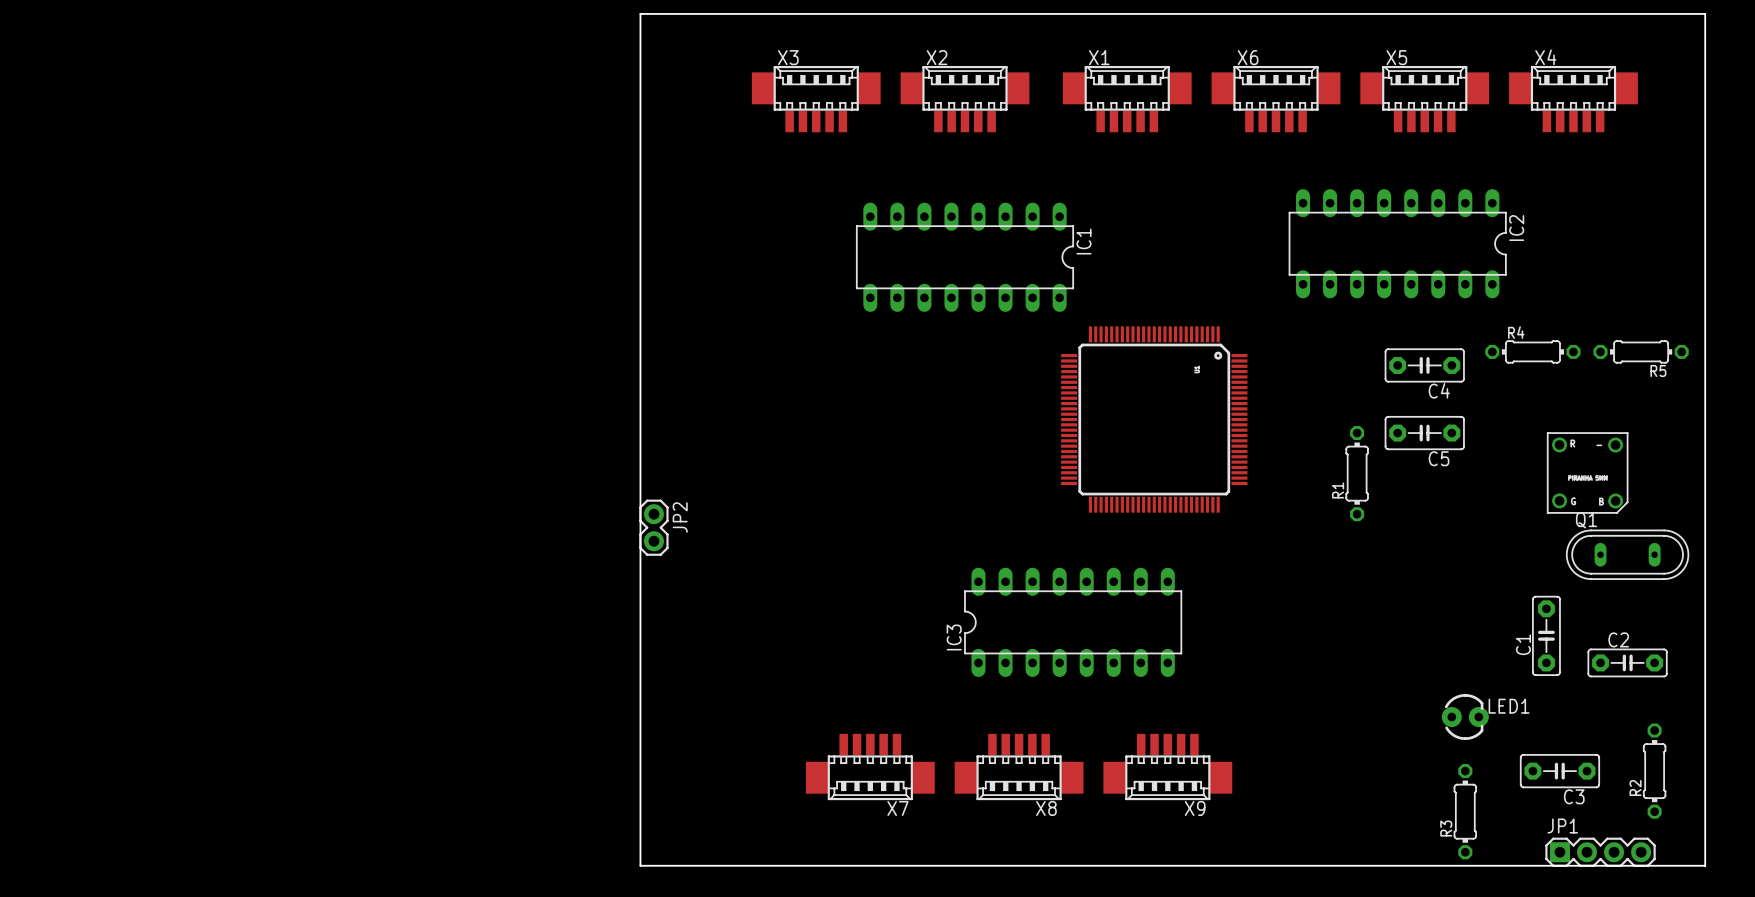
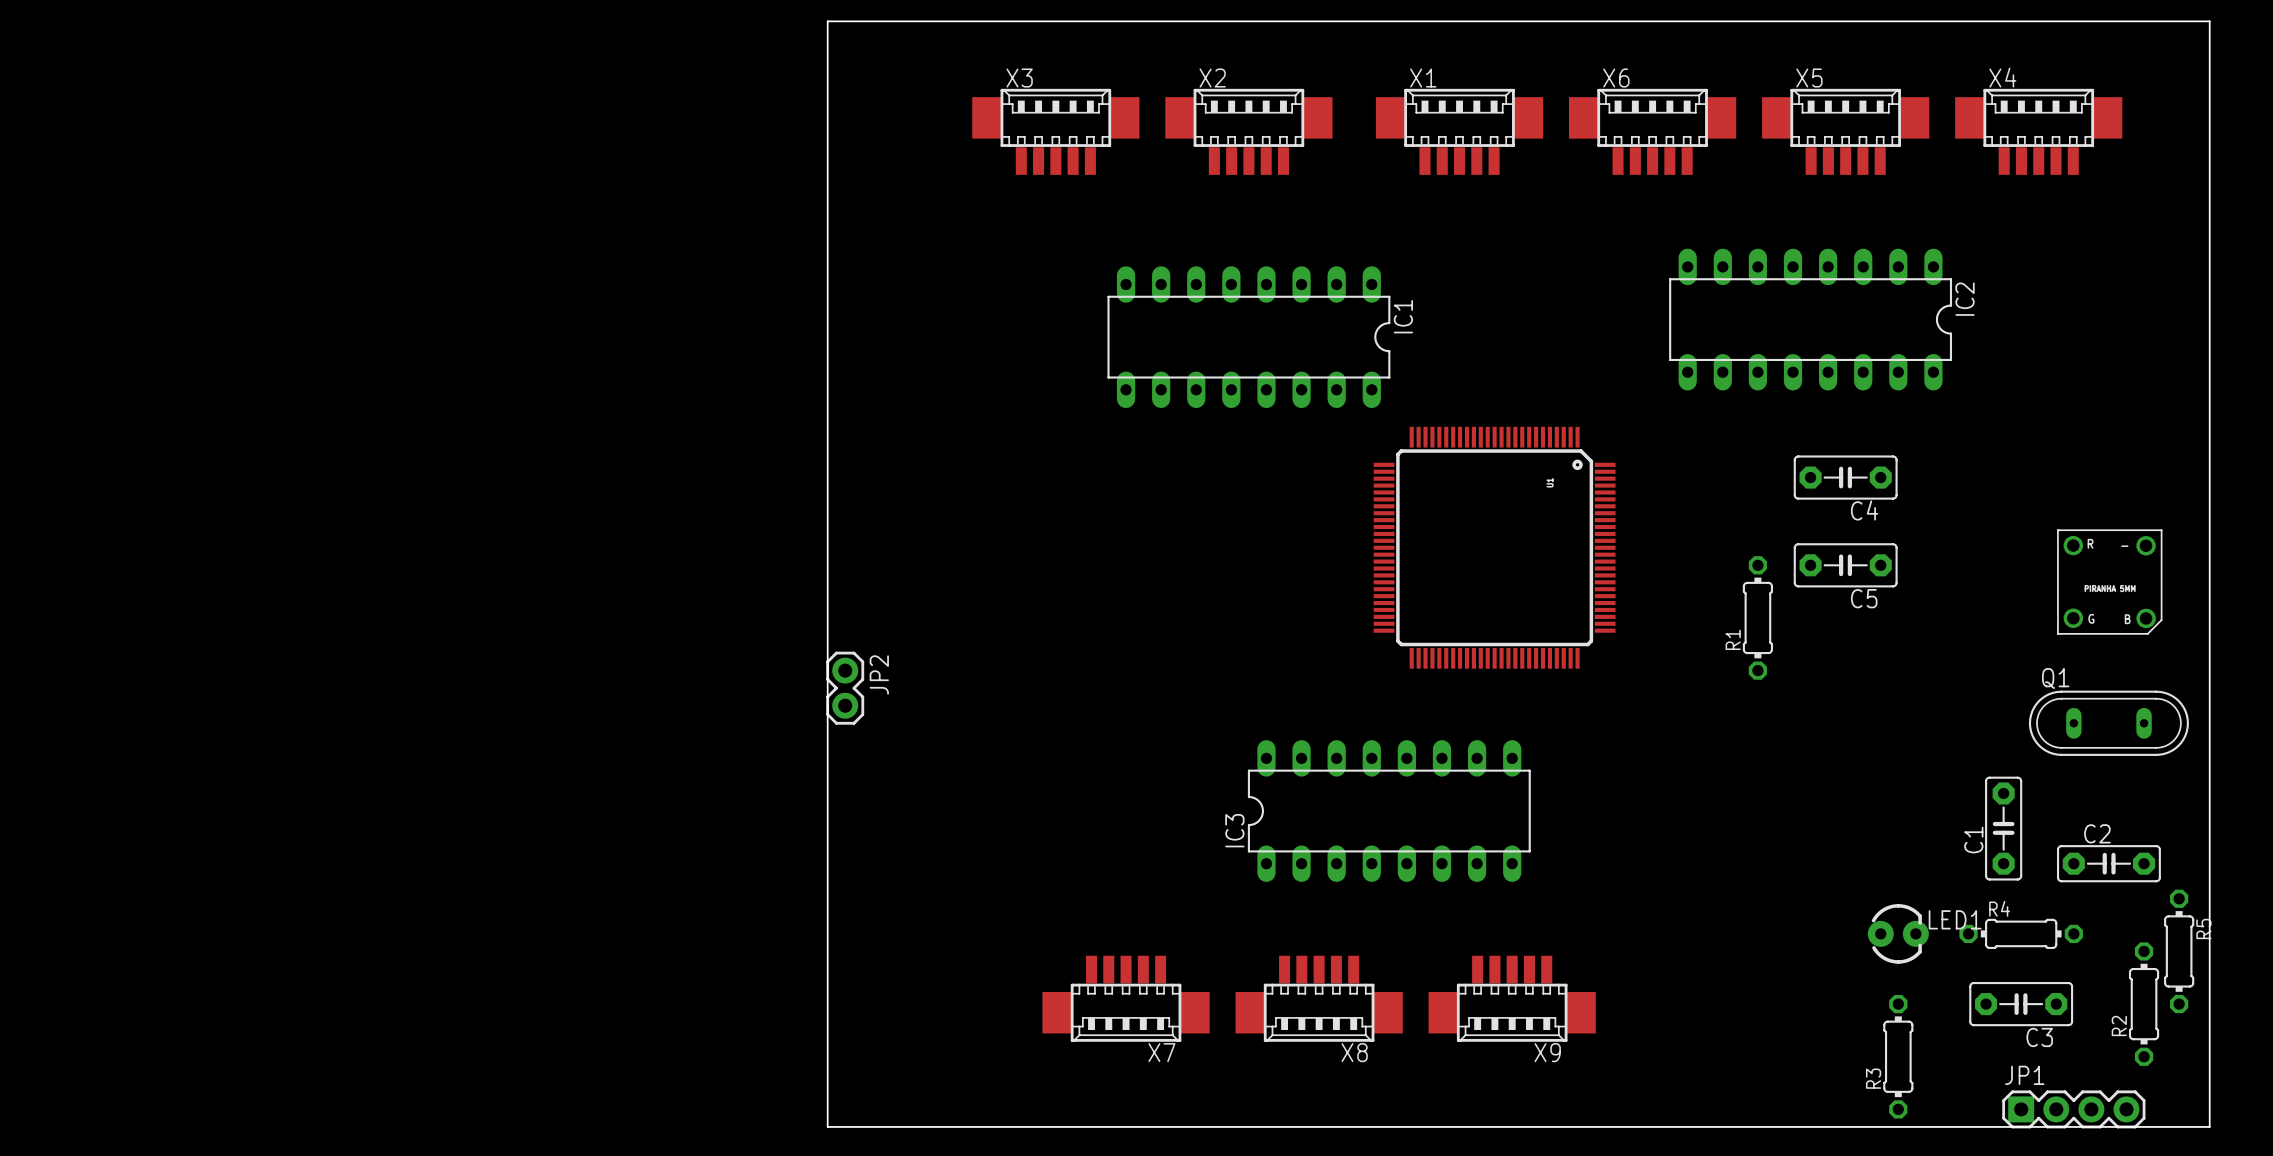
R4 position: (1532, 351) -> (2021, 933)
R5 rotation: 0° (1641, 351) -> 90° clockwise (2179, 951)
R5 position: (1641, 351) -> (2179, 951)
R5 name position: R5 (1658, 370) -> R5 (2203, 928)
part position: (1587, 472) -> (2109, 582)

